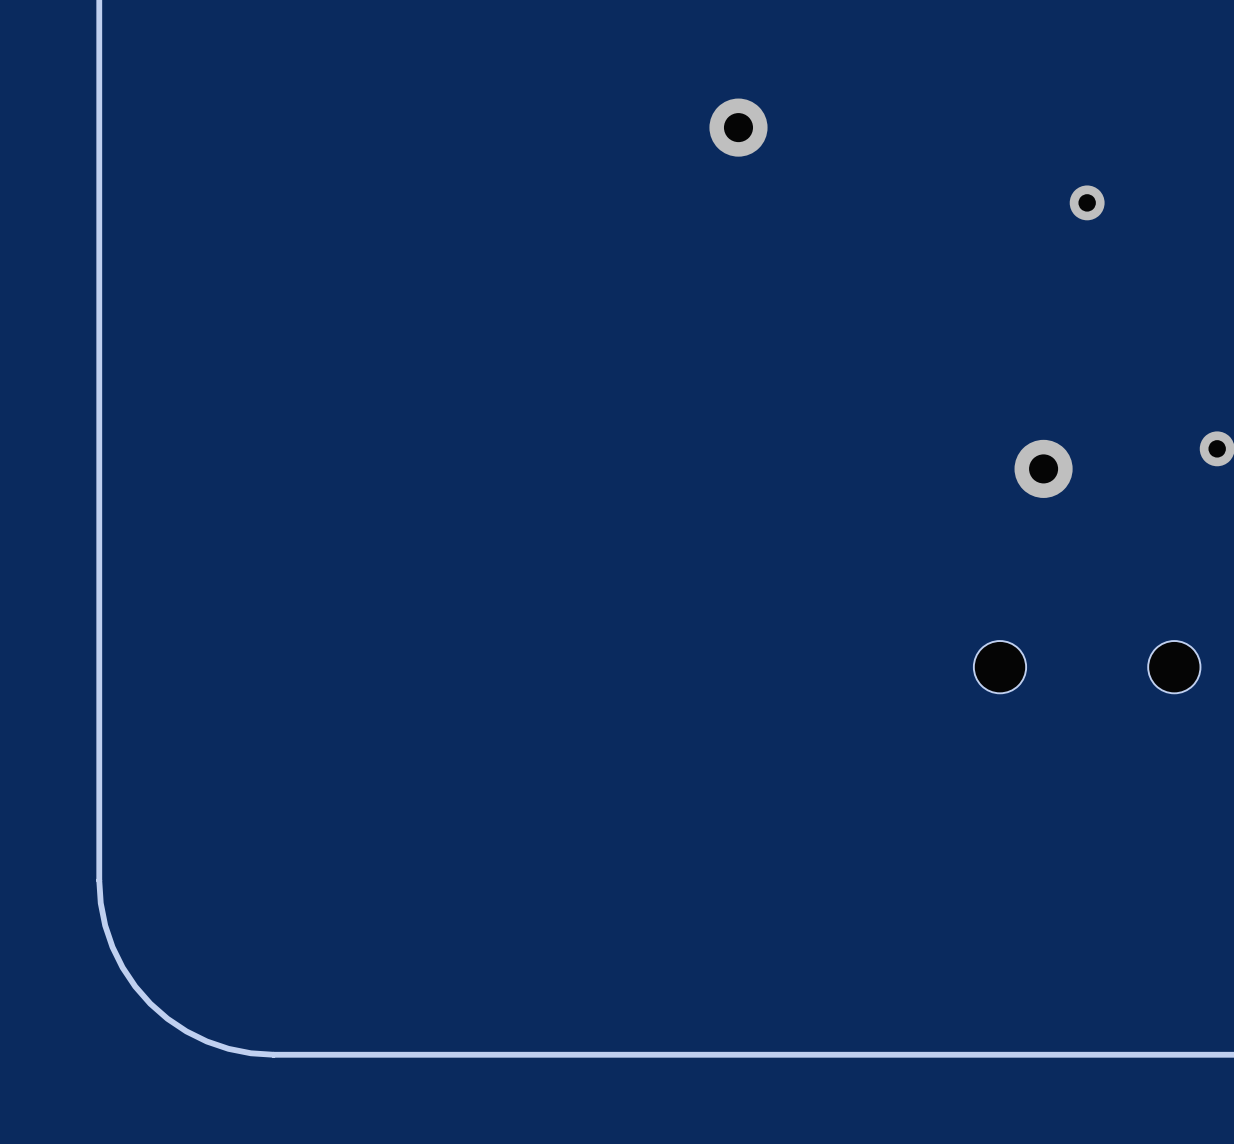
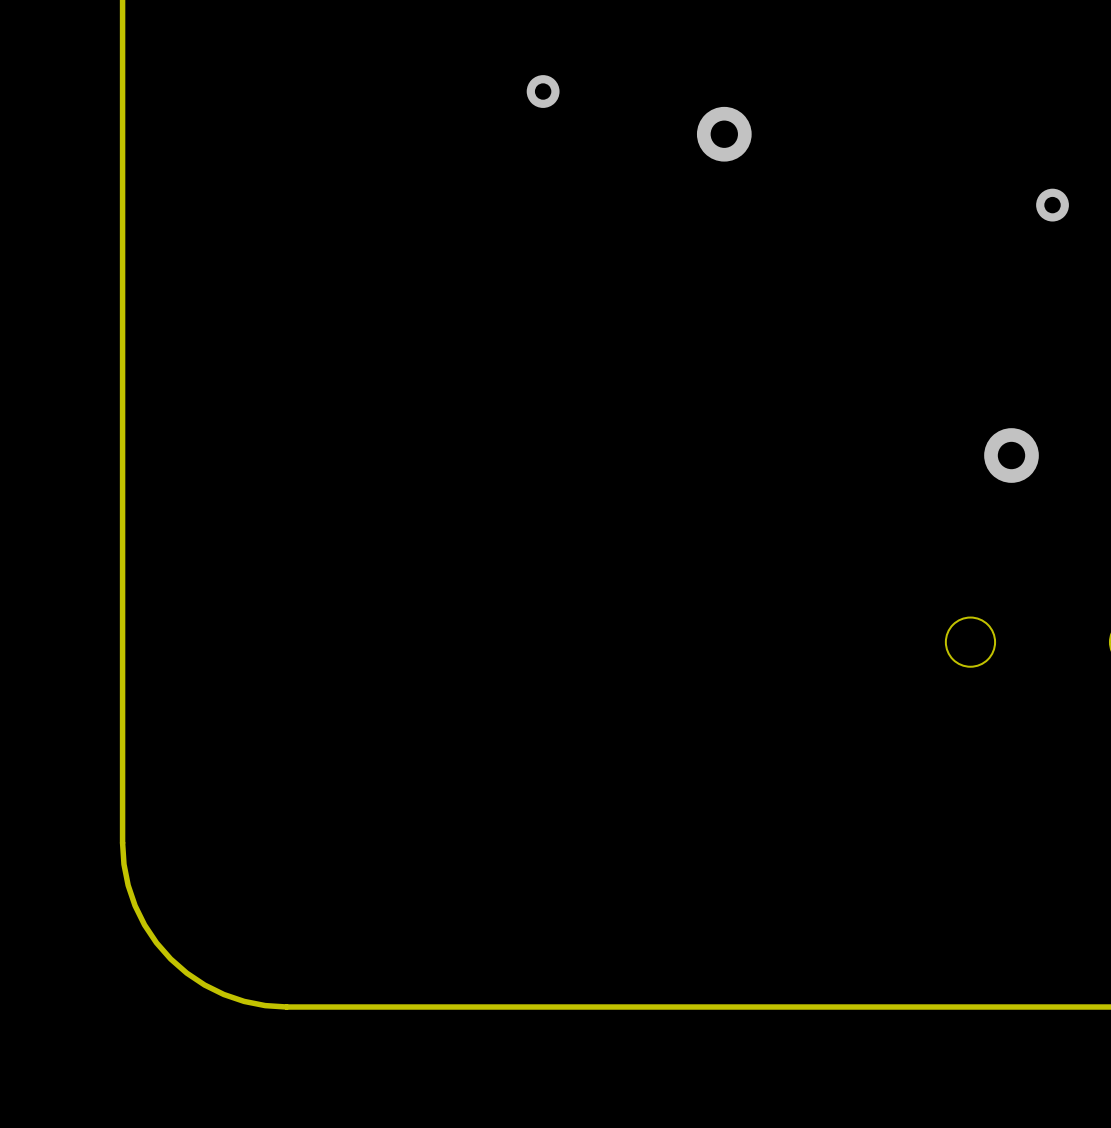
via: none -> (543, 91)

